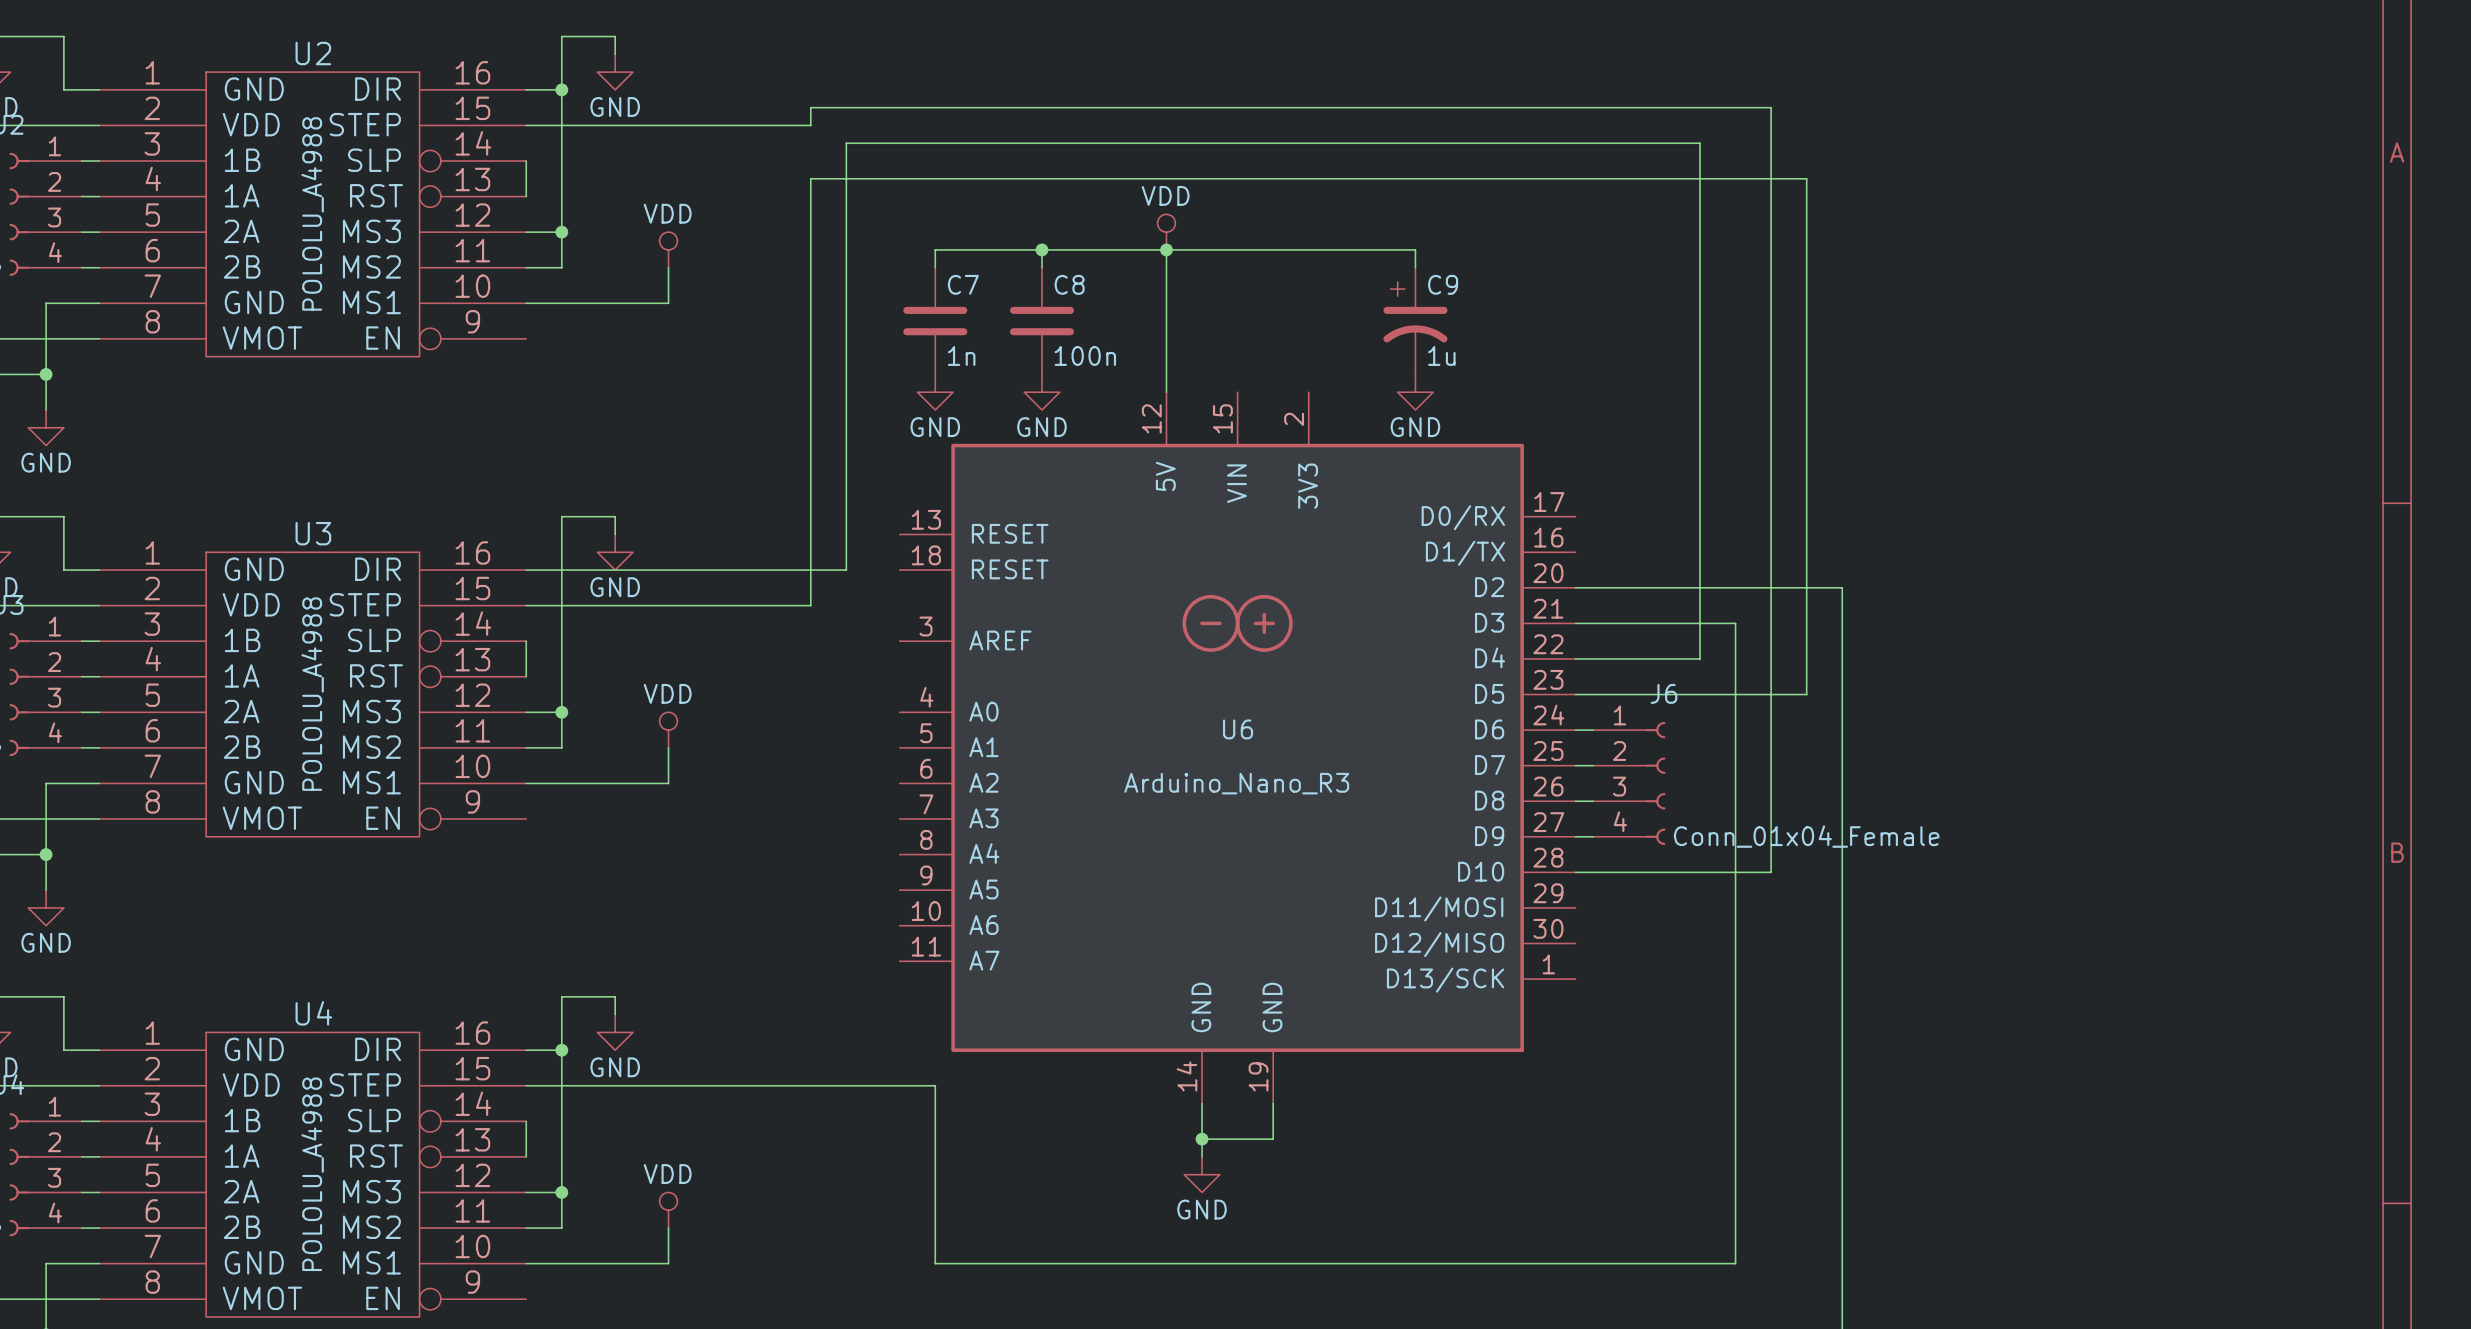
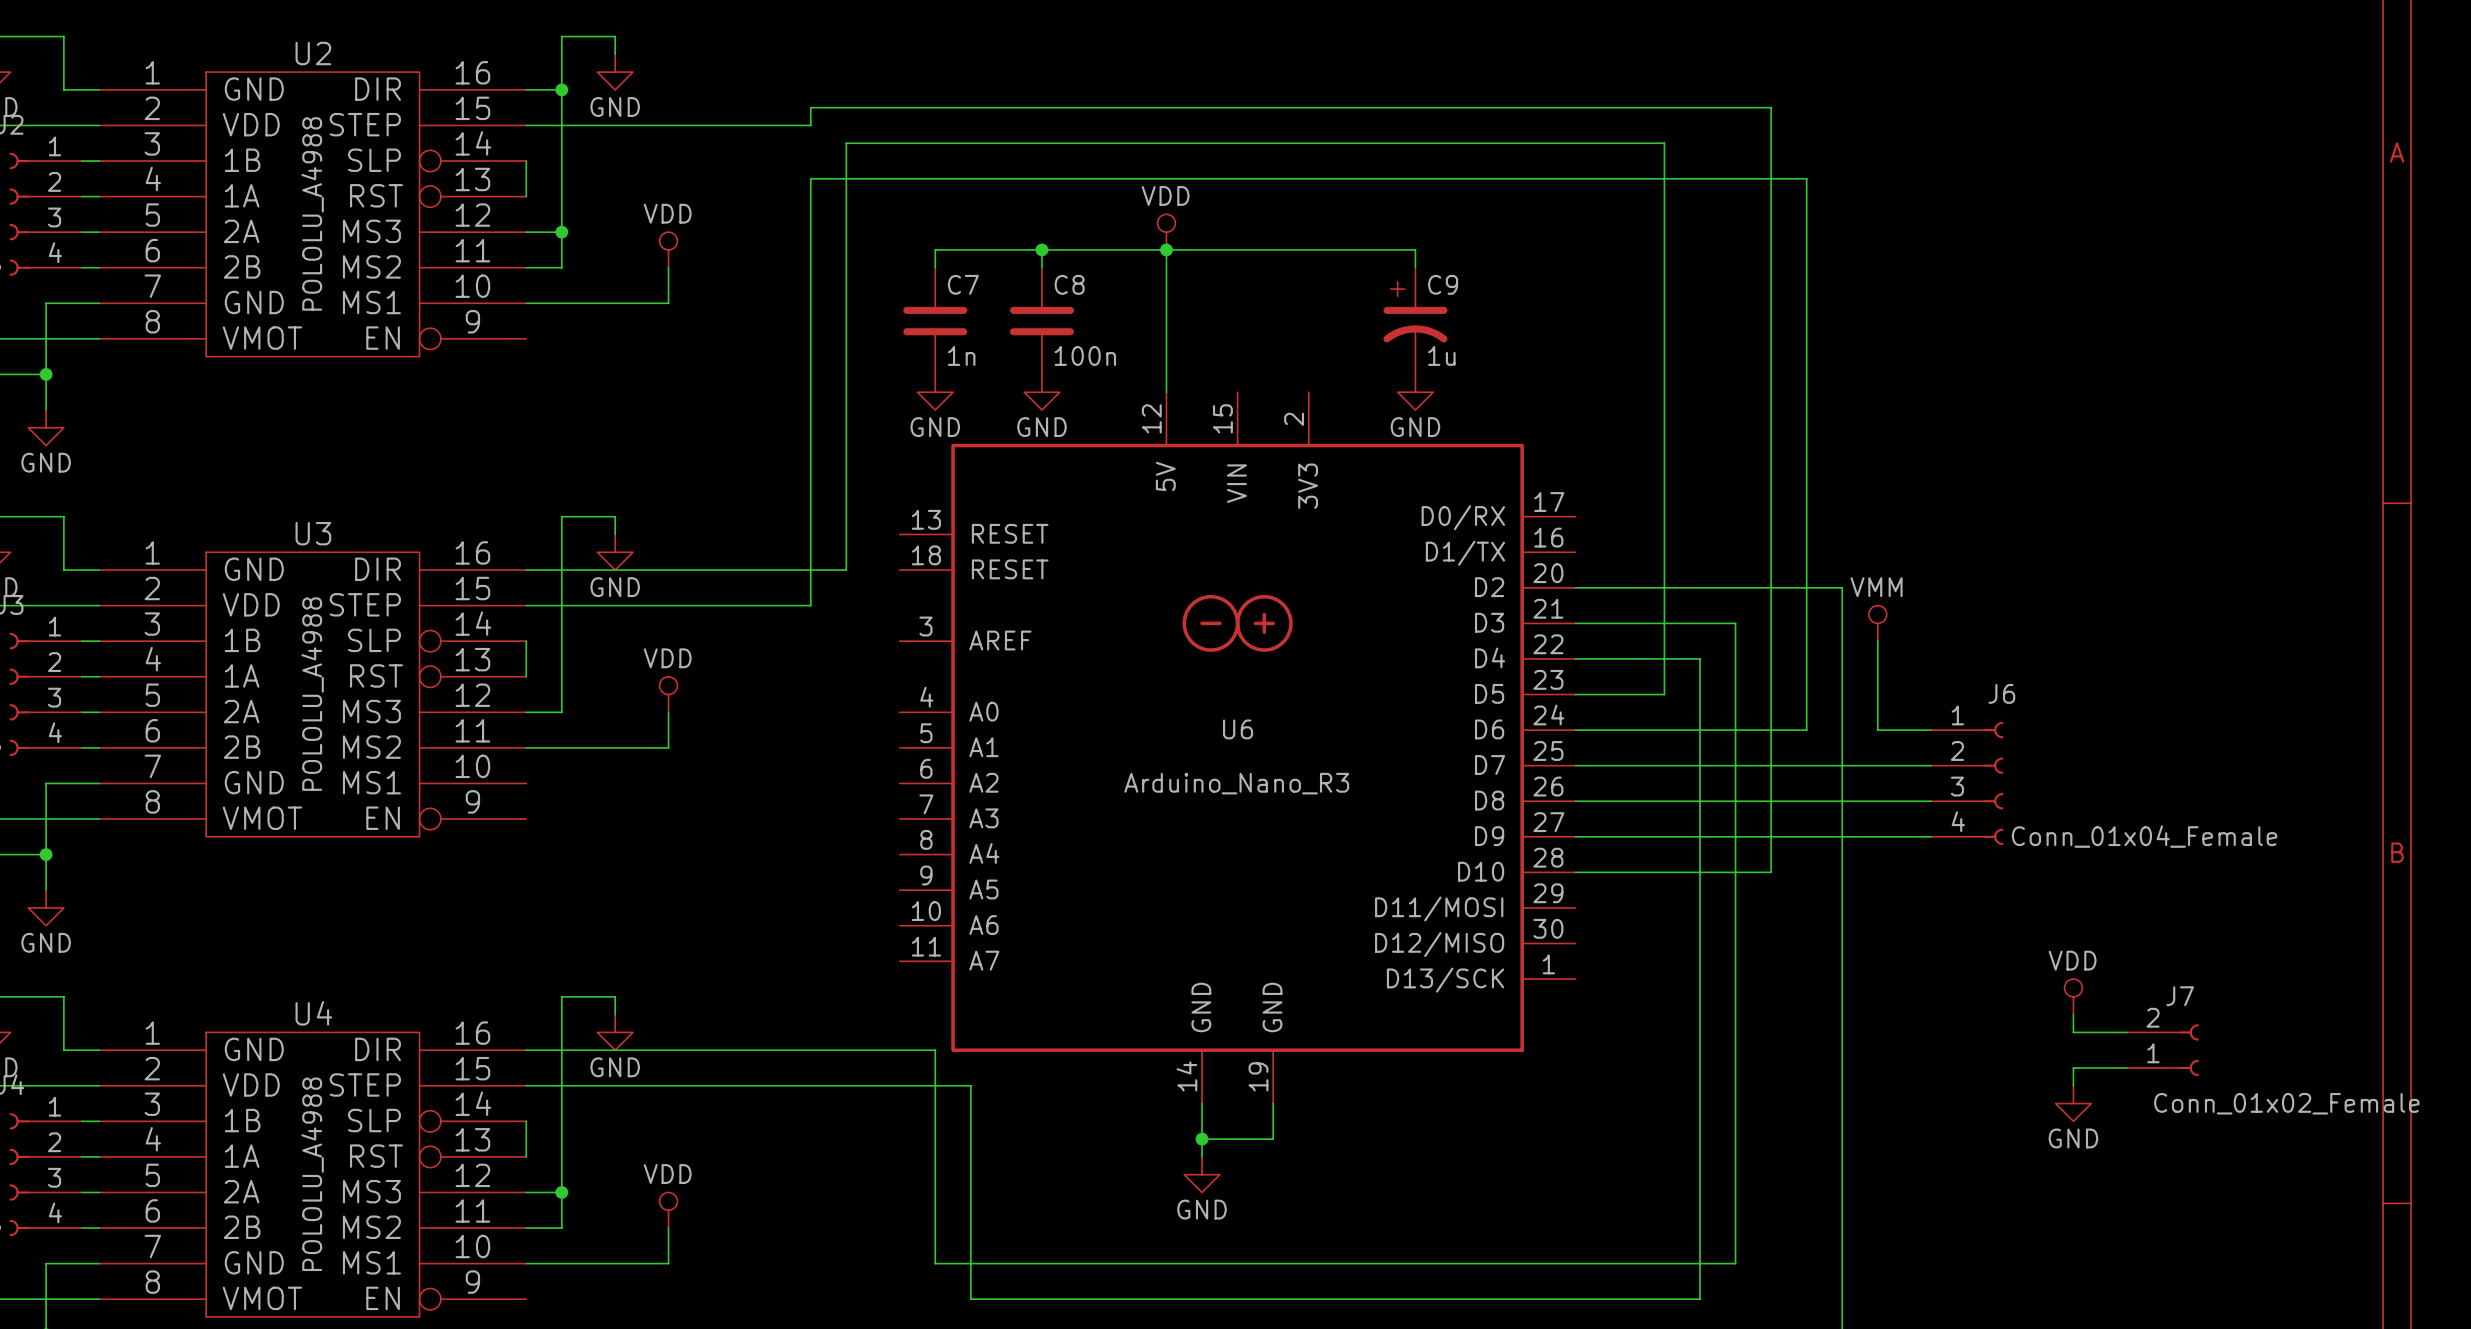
wire: (1664, 143) (1699, 143) (1699, 658) -> (1664, 143) (1664, 694)
power symbol: none -> VMM (1877, 623)
wire: none -> (1877, 641) (1877, 730) (1931, 730)
wire: none -> (1699, 658) (1699, 1299) (970, 1299) (970, 1085) (935, 1085) (935, 1050) (561, 1050)
wire: (1664, 694) (1806, 694) -> (1593, 730) (1806, 730) (1806, 694)
wire: (561, 712) (561, 747) -> (668, 712) (668, 747) (561, 747)
junction: (561, 712) -> none
power symbol position: VDD (668, 730) -> VDD (668, 694)
wire: (668, 747) (668, 783) (526, 783) -> none
wire: none -> (1593, 765) (1931, 765)
J6 position: (1629, 783) -> (1967, 783)
wire: none -> (1593, 801) (1931, 801)
wire: none -> (1593, 836) (1931, 836)
power symbol: none -> VDD (2073, 996)
wire: none -> (2073, 1014) (2073, 1032) (2126, 1032)
junction: (561, 1050) -> none
J7: none -> Conn_01x02_Female (2162, 1050)
wire: none -> (2126, 1067) (2073, 1067) (2073, 1085)
power symbol: none -> GND (2073, 1103)

